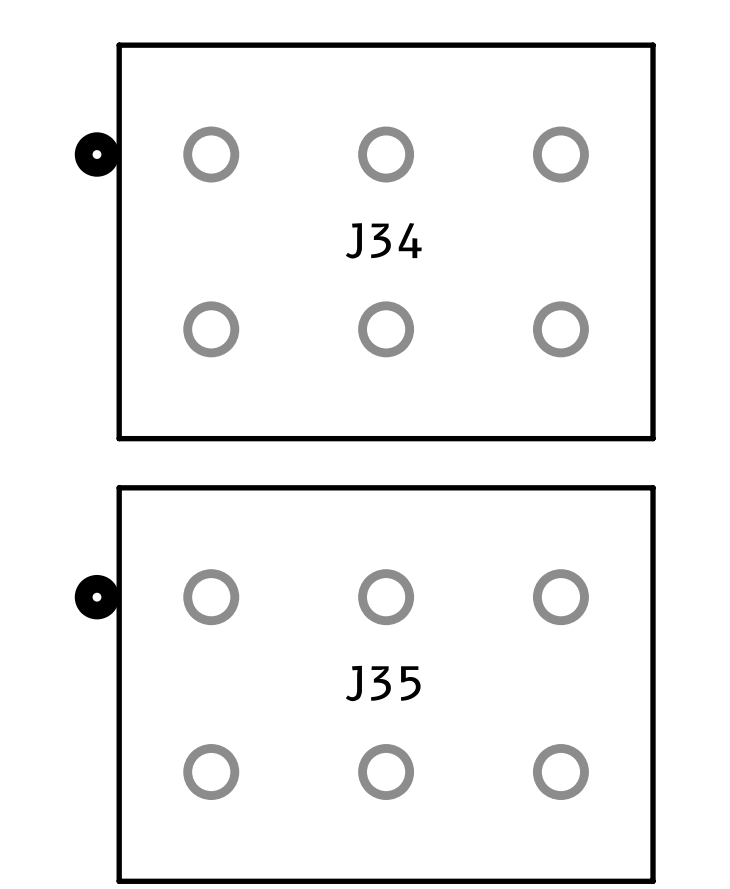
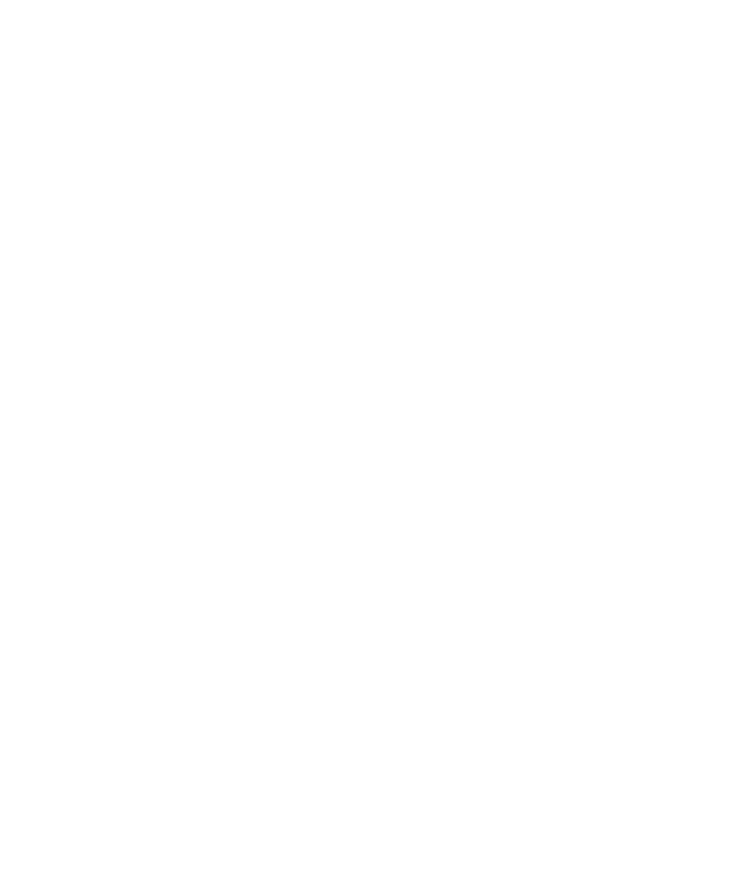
J34: (365, 241) -> none
J35: (365, 684) -> none

